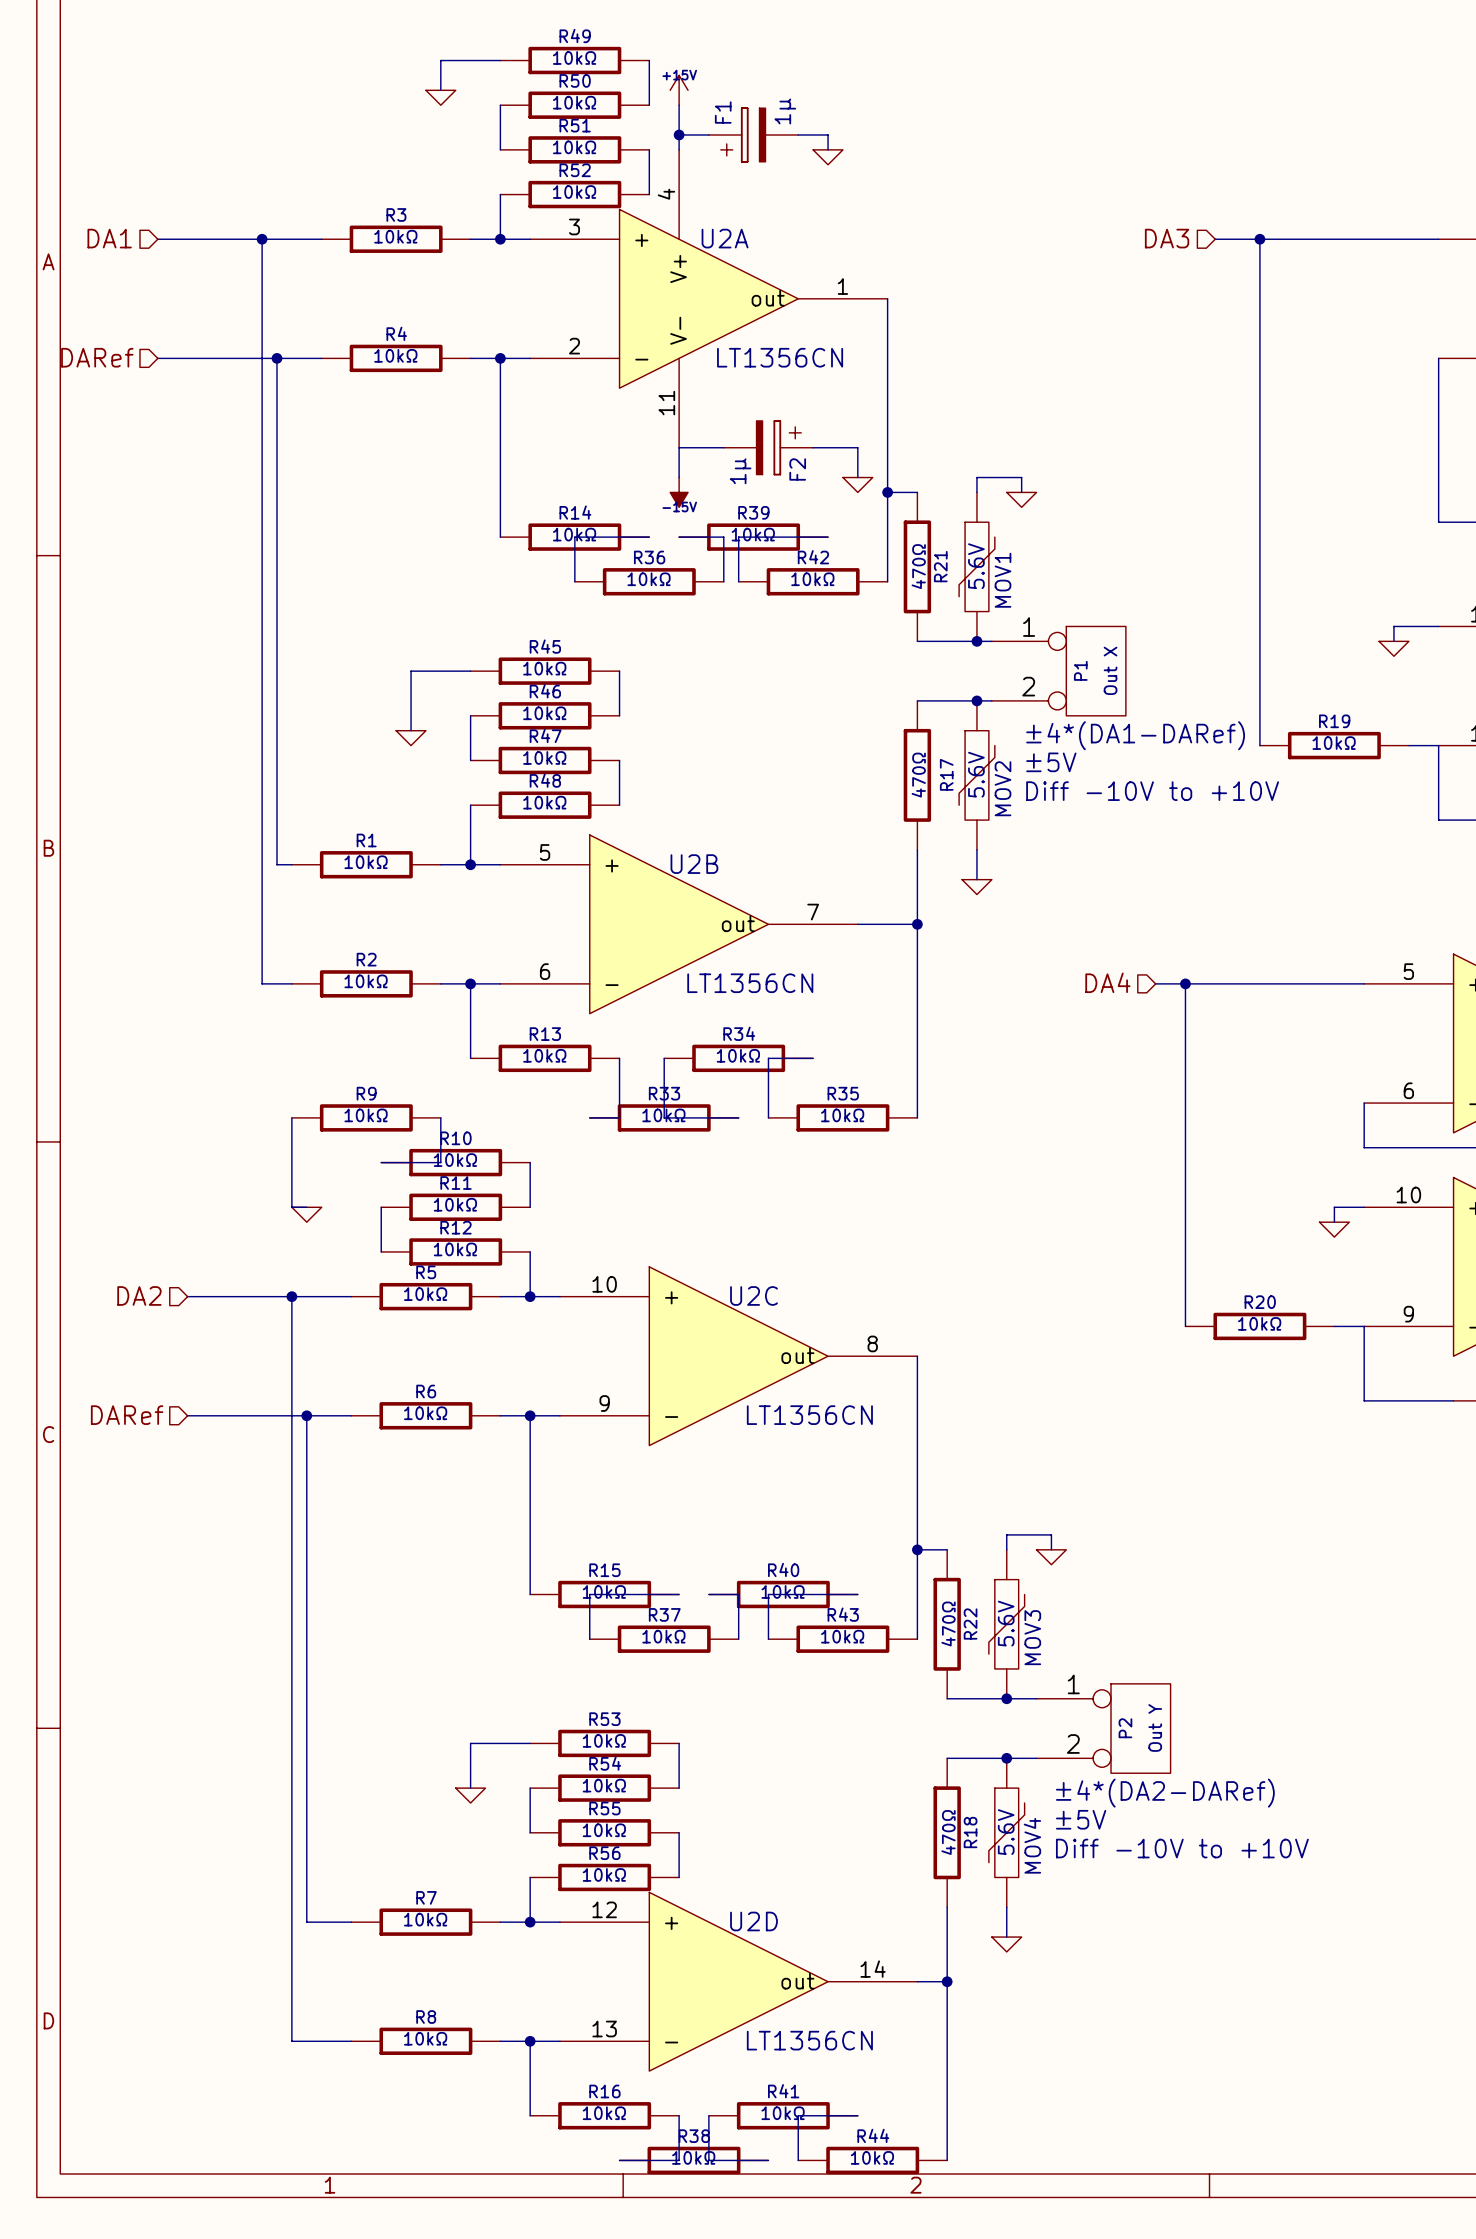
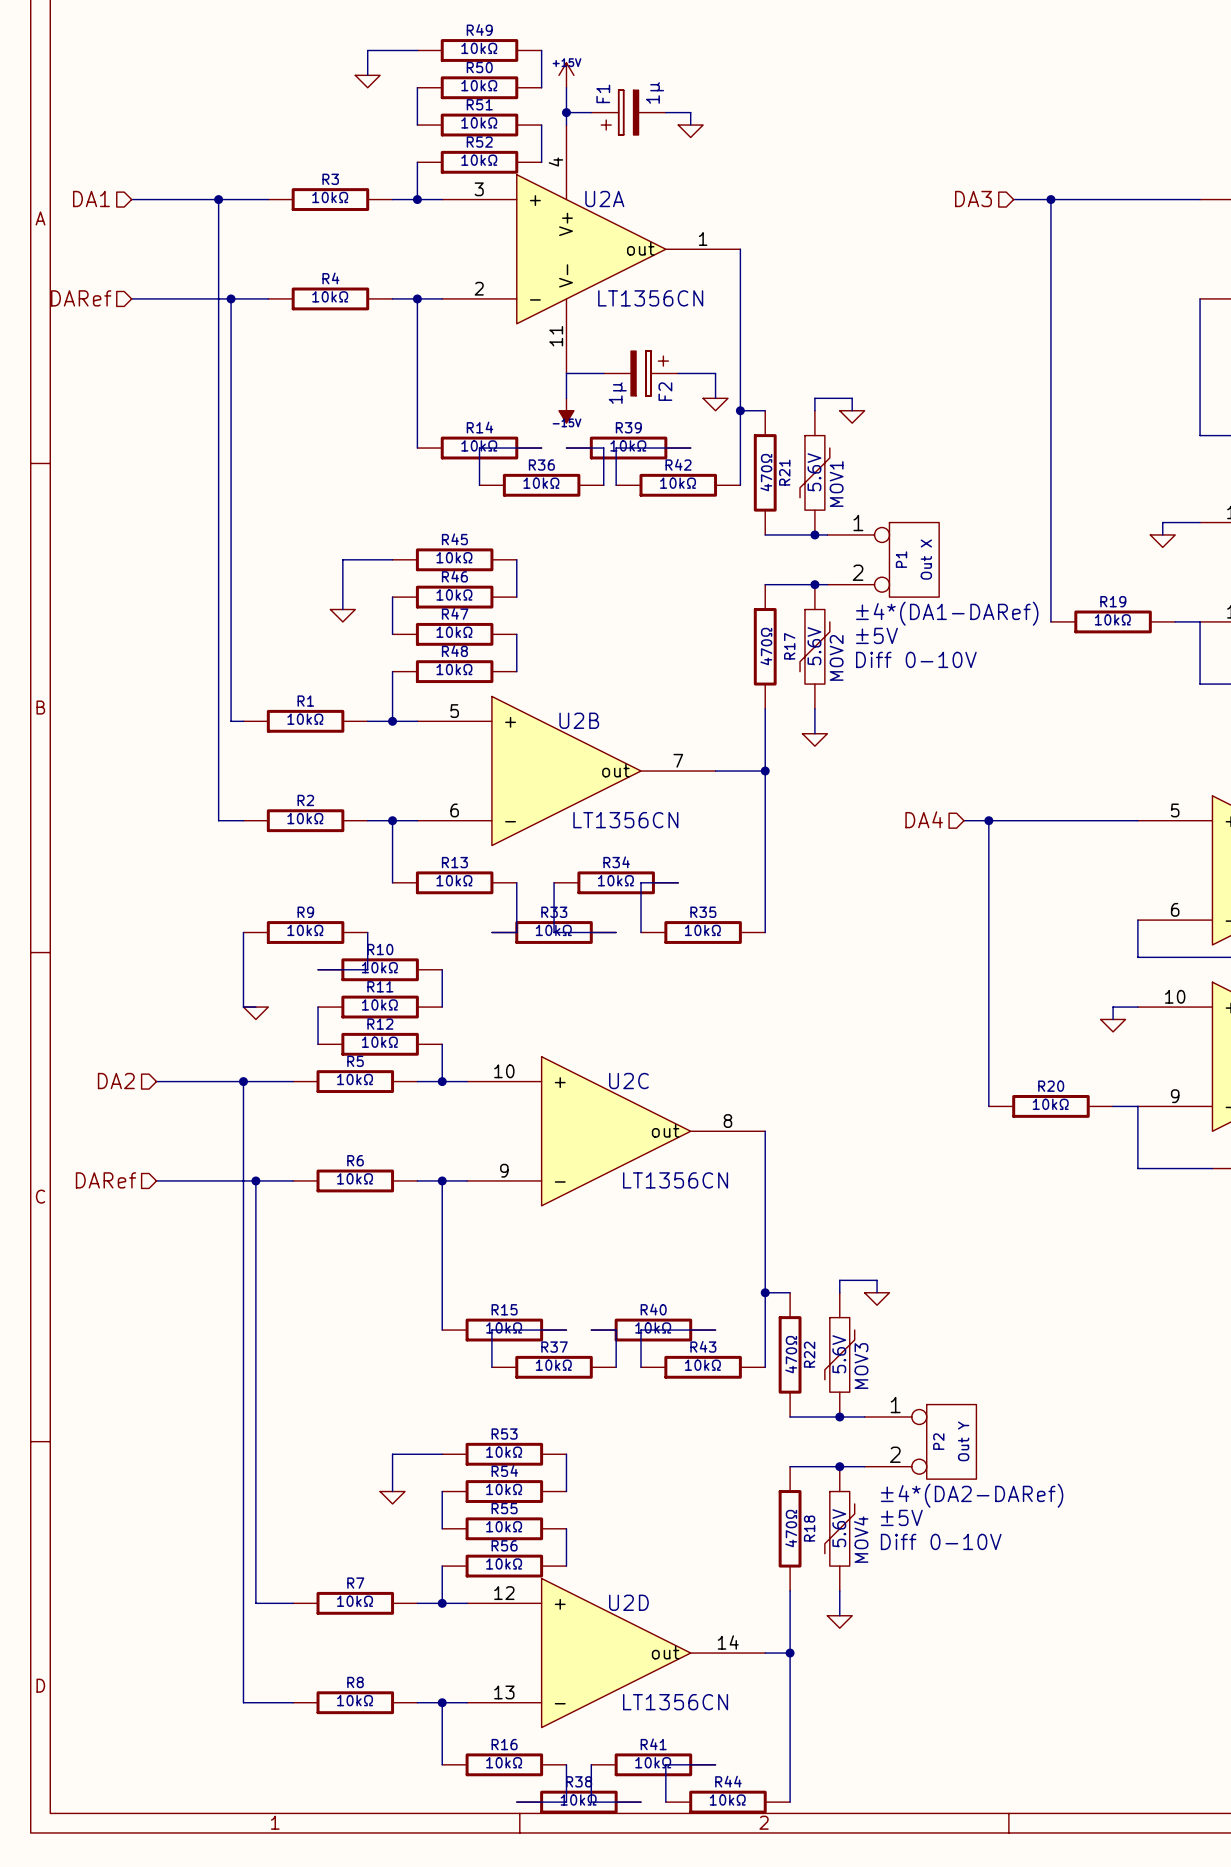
text: Diff -10V to +10V (1152, 791) -> Diff 0-10V (916, 659)
text: Diff -10V to +10V (1182, 1848) -> Diff 0-10V (941, 1541)

